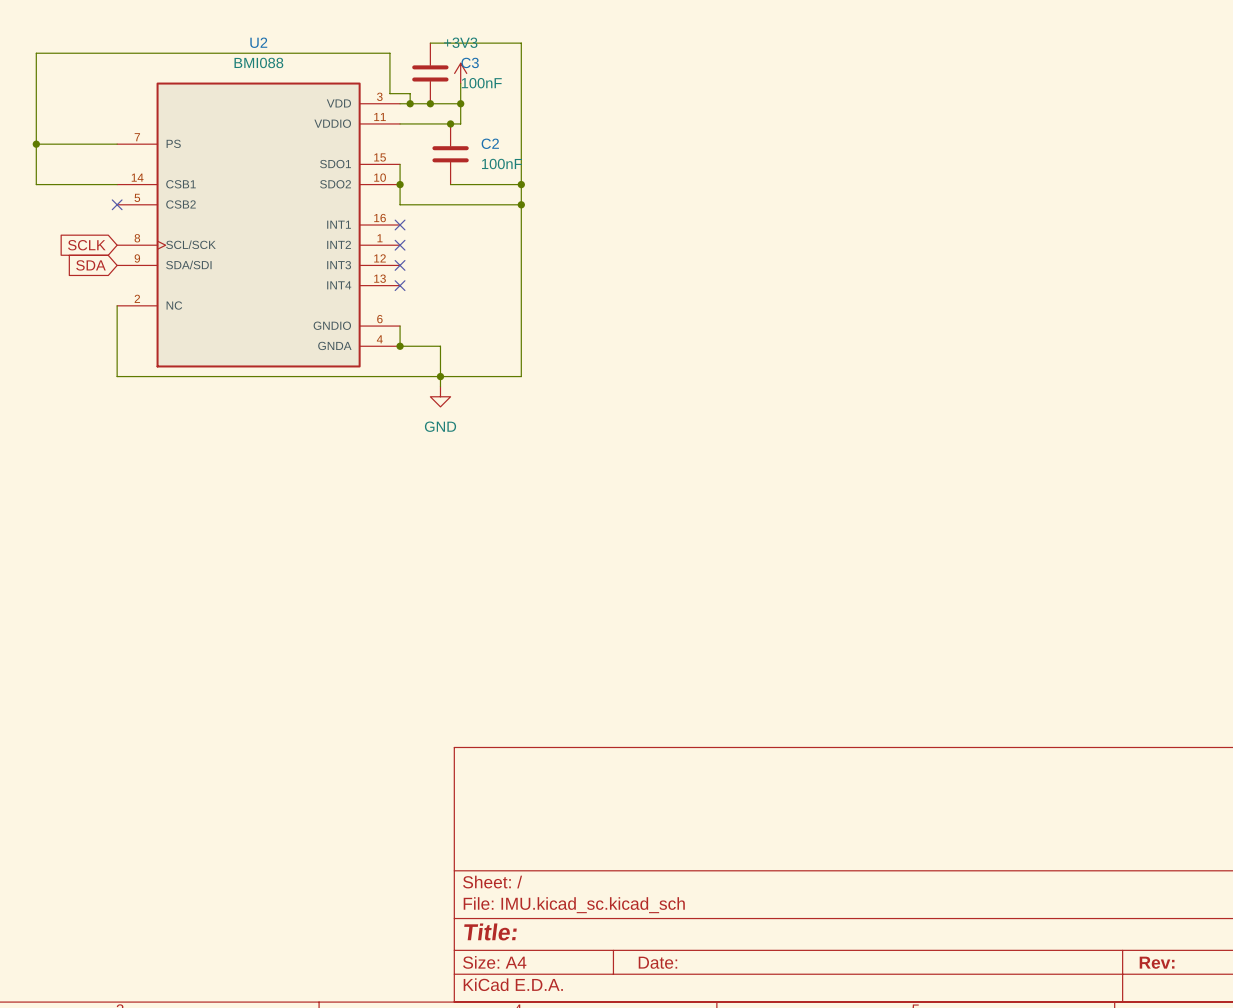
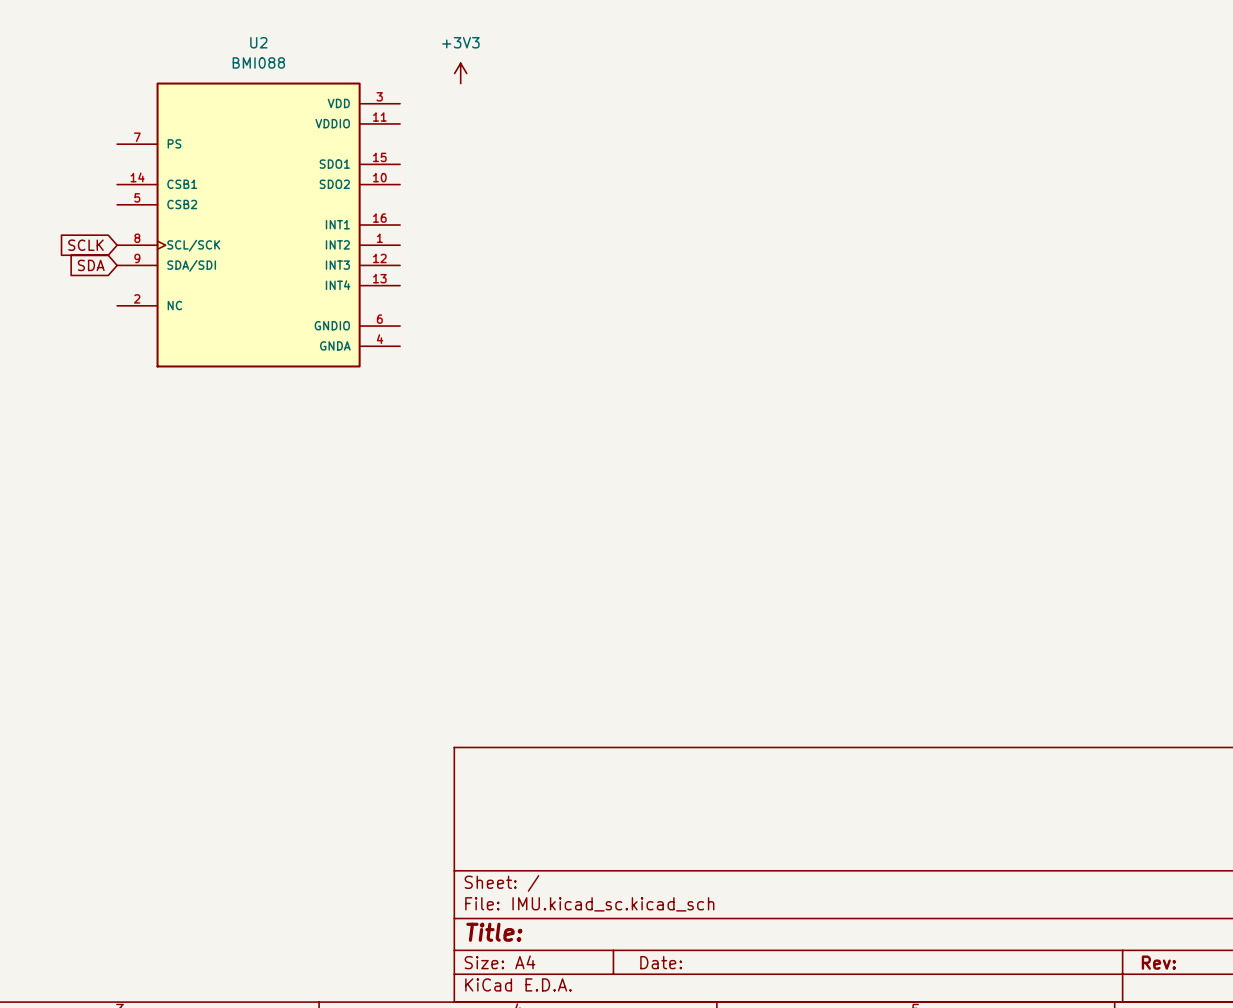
wire: (430, 43) (521, 43) (521, 376) (117, 376) (117, 305) -> none
C3: 100nF (430, 73) -> none
wire: (460, 83) (460, 123) (400, 123) -> none
wire: (400, 103) (460, 103) -> none
wire: (410, 103) (410, 93) (389, 93) (389, 53) (36, 53) (36, 184) (117, 184) -> none
junction: (410, 103) -> none
junction: (430, 103) -> none
junction: (460, 103) -> none
junction: (450, 123) -> none
wire: (36, 144) (117, 144) -> none
junction: (36, 144) -> none
C2: 100nF (450, 154) -> none
wire: (400, 164) (400, 204) (521, 204) -> none
junction: (400, 184) -> none
wire: (450, 184) (521, 184) -> none
junction: (521, 184) -> none
no-connect mark: (117, 204) -> none
junction: (521, 204) -> none
no-connect mark: (400, 225) -> none
no-connect mark: (400, 245) -> none
no-connect mark: (400, 265) -> none
no-connect mark: (400, 285) -> none
wire: (400, 326) (400, 346) (440, 346) (440, 386) -> none
junction: (400, 346) -> none
junction: (440, 376) -> none
power symbol: GND (440, 396) -> none

